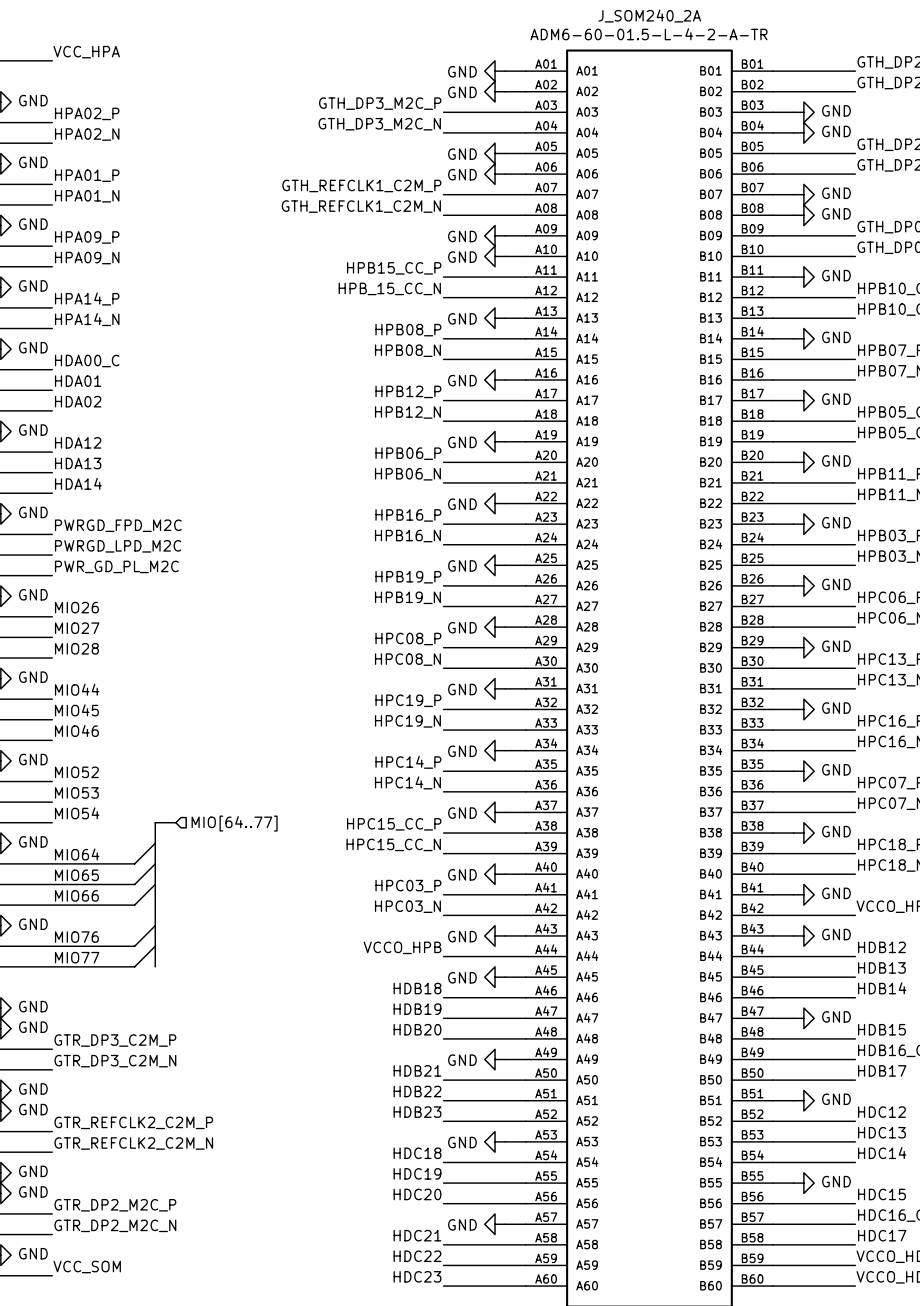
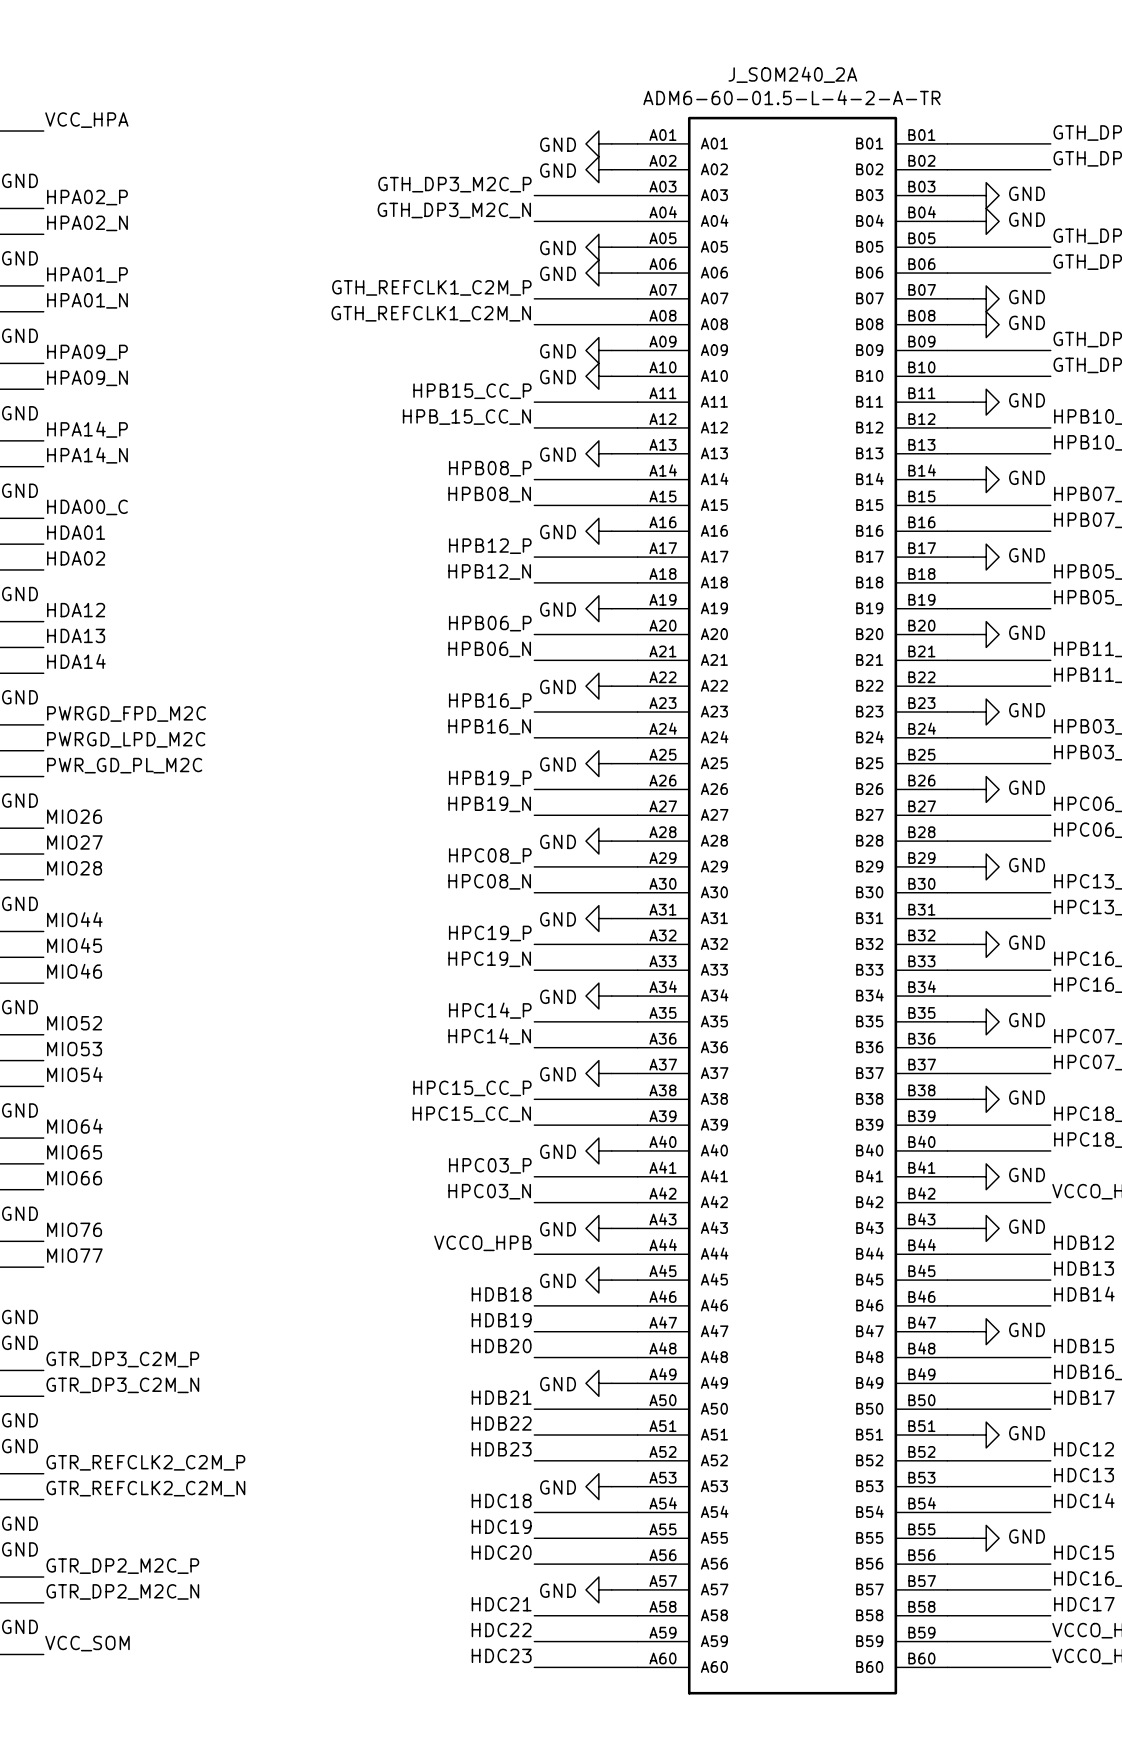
bus: (175, 822) (155, 822) (155, 966) -> none
hierarchical label: MIO[64..77] (234, 823) -> none
wire: (155, 843) (134, 863) (52, 863) -> none
wire: (155, 863) (134, 884) (52, 884) -> none
wire: (155, 884) (134, 905) (52, 905) -> none
wire: (155, 925) (134, 946) (52, 946) -> none
wire: (155, 946) (134, 966) (52, 966) -> none

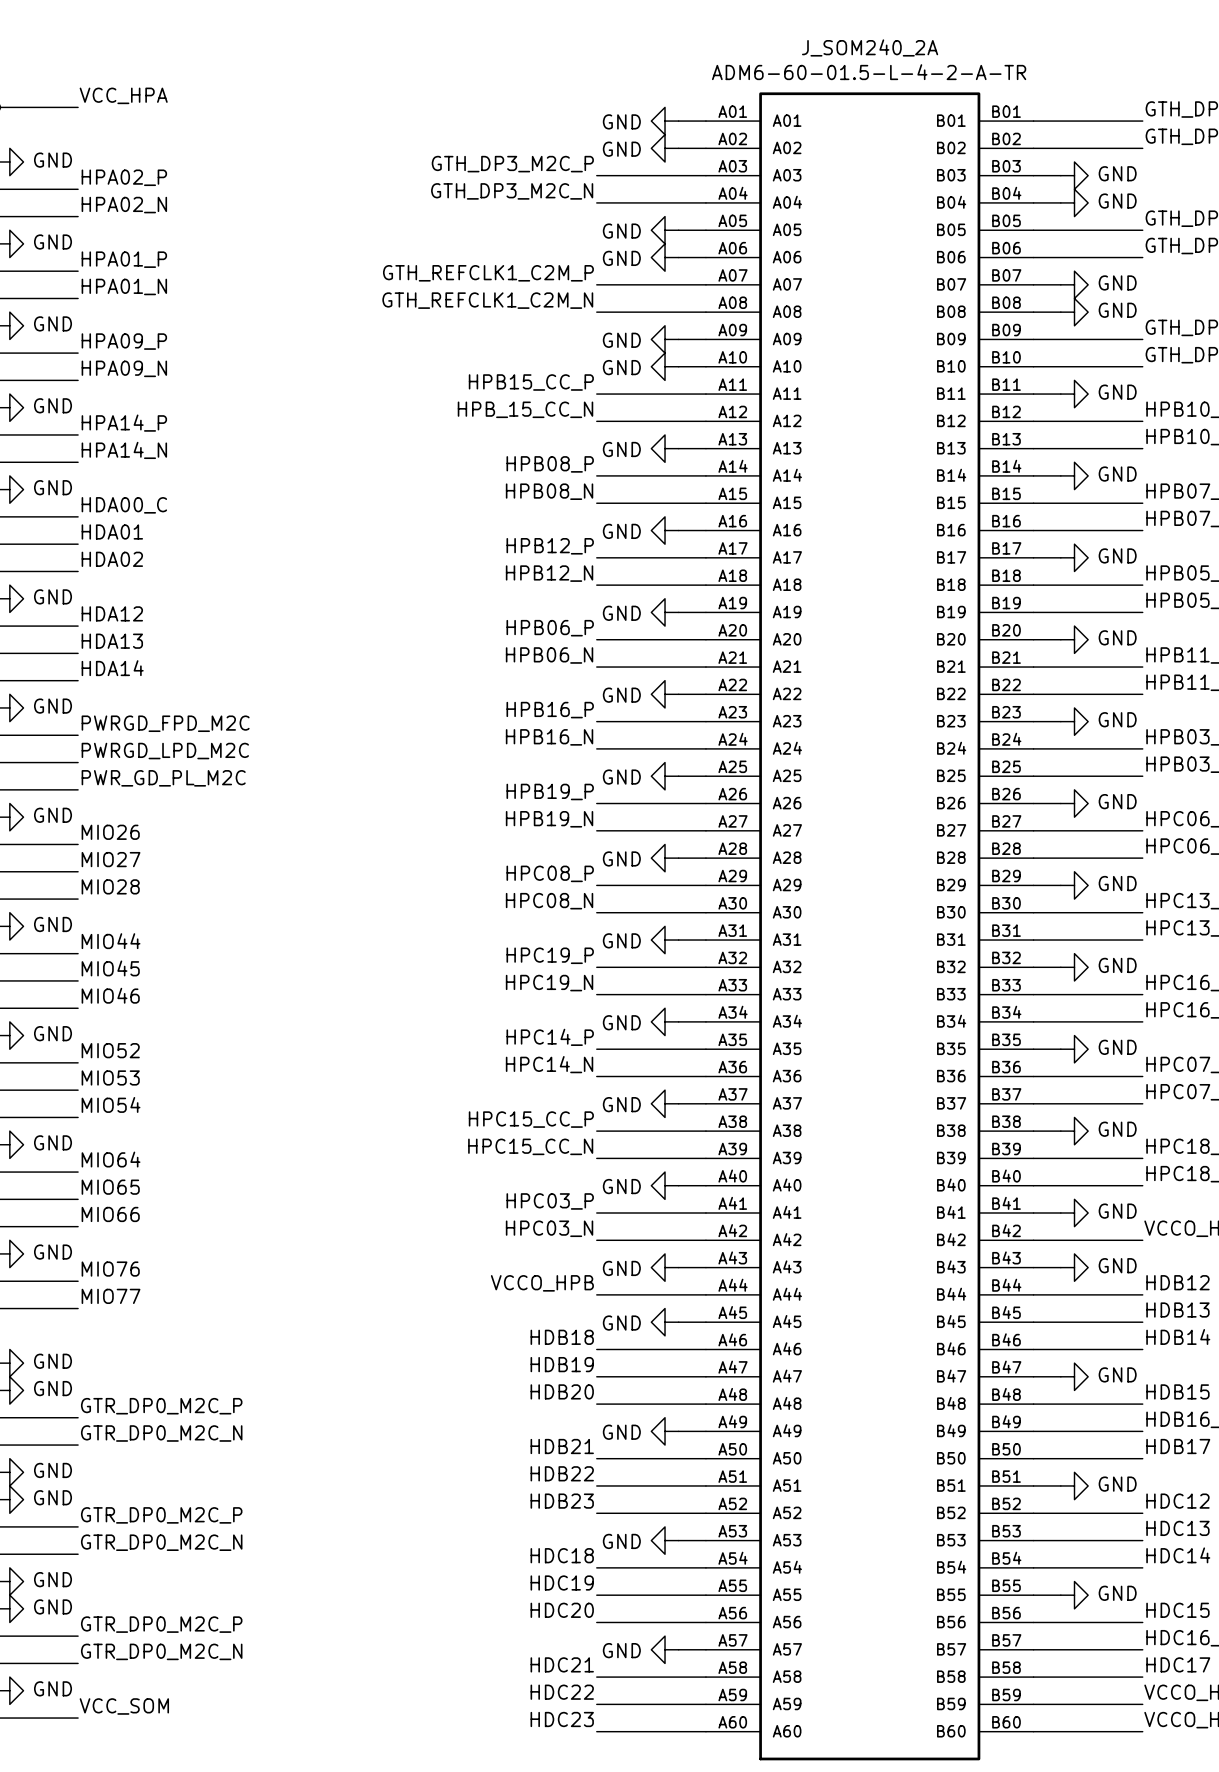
label: GTR_DP3_C2M_P (122, 1359) -> GTR_DP0_M2C_P (161, 1406)
label: GTR_DP3_C2M_N (122, 1385) -> GTR_DP0_M2C_N (161, 1433)
label: GTR_REFCLK2_C2M_P (145, 1462) -> GTR_DP0_M2C_P (161, 1515)
label: GTR_REFCLK2_C2M_N (145, 1488) -> GTR_DP0_M2C_N (161, 1542)
label: GTR_DP2_M2C_P (122, 1566) -> GTR_DP0_M2C_P (161, 1624)
label: GTR_DP2_M2C_N (122, 1591) -> GTR_DP0_M2C_N (161, 1651)

